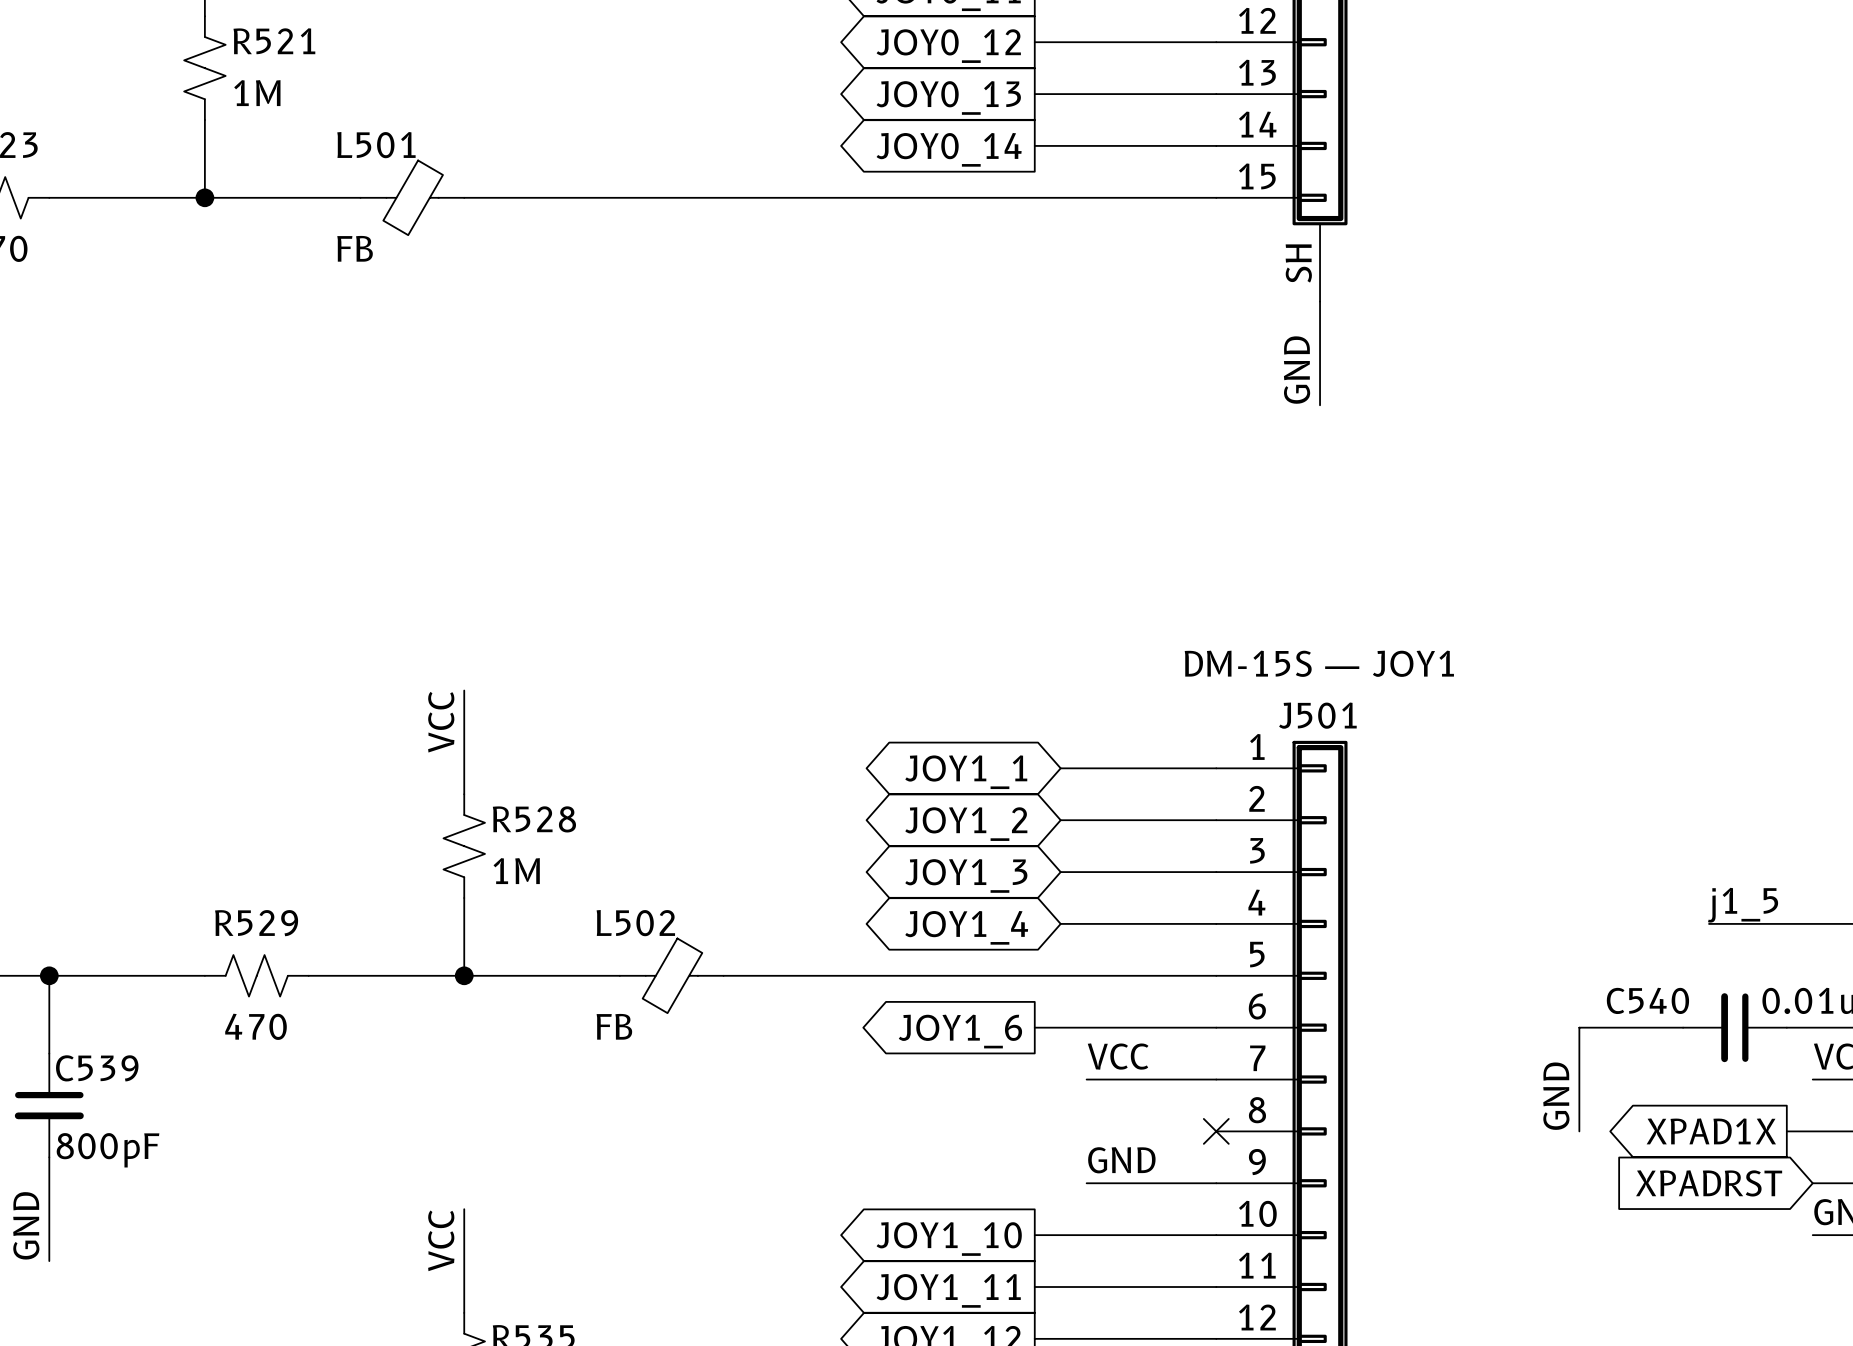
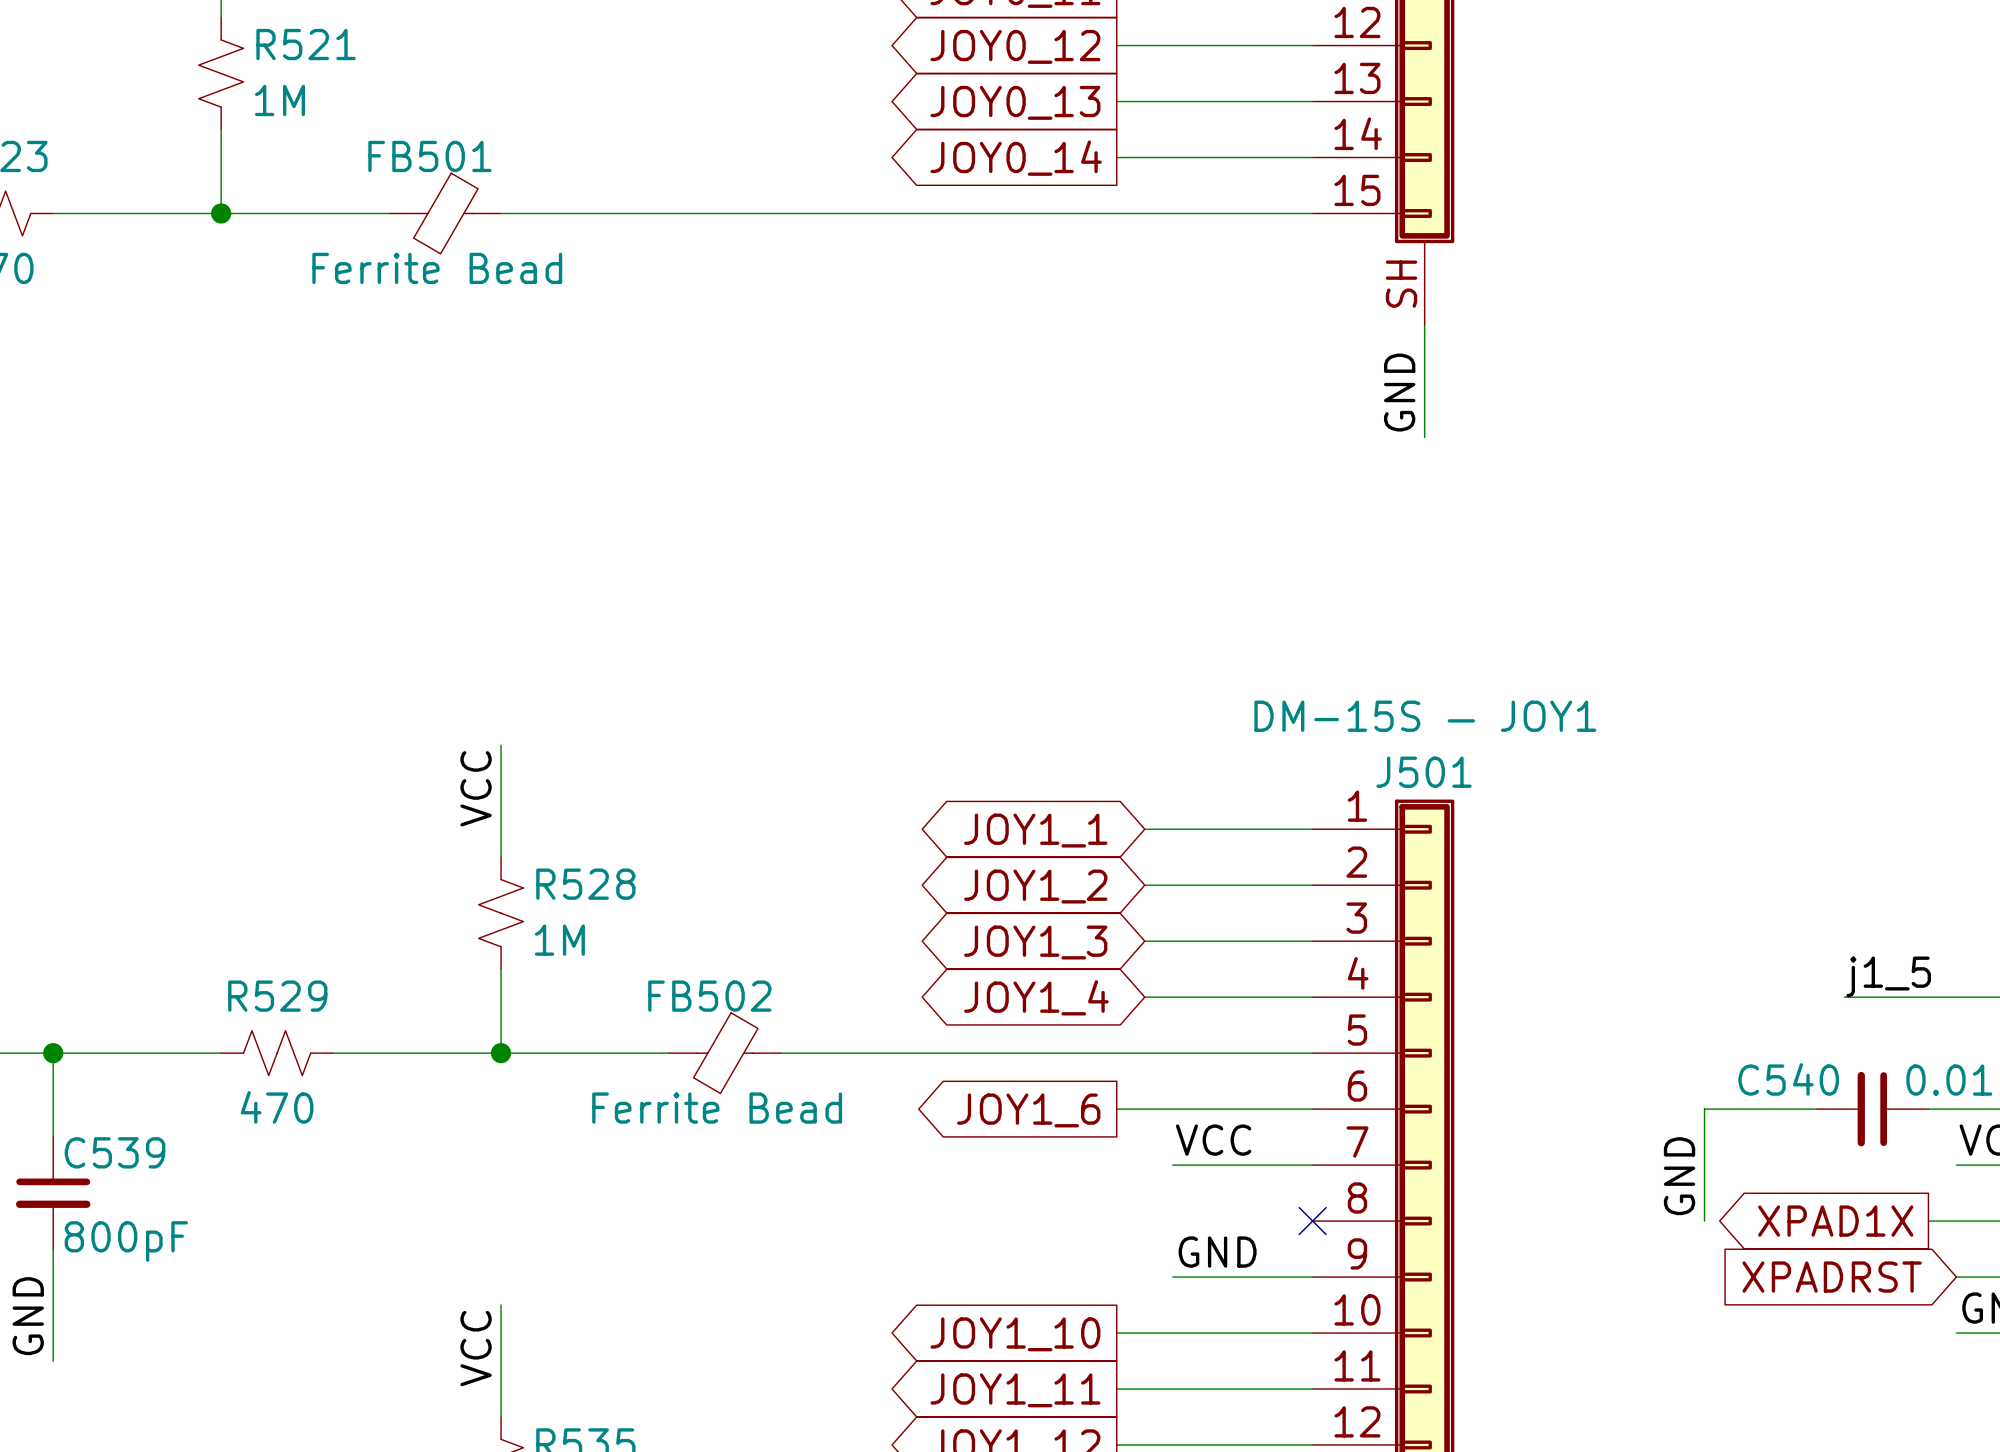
L501 name: L501 (376, 145) -> FB501 (429, 156)
L501 value: FB (355, 248) -> Ferrite Bead (437, 268)
L502 name: L502 (635, 923) -> FB502 (709, 996)
L502 value: FB (614, 1026) -> Ferrite Bead (717, 1108)

